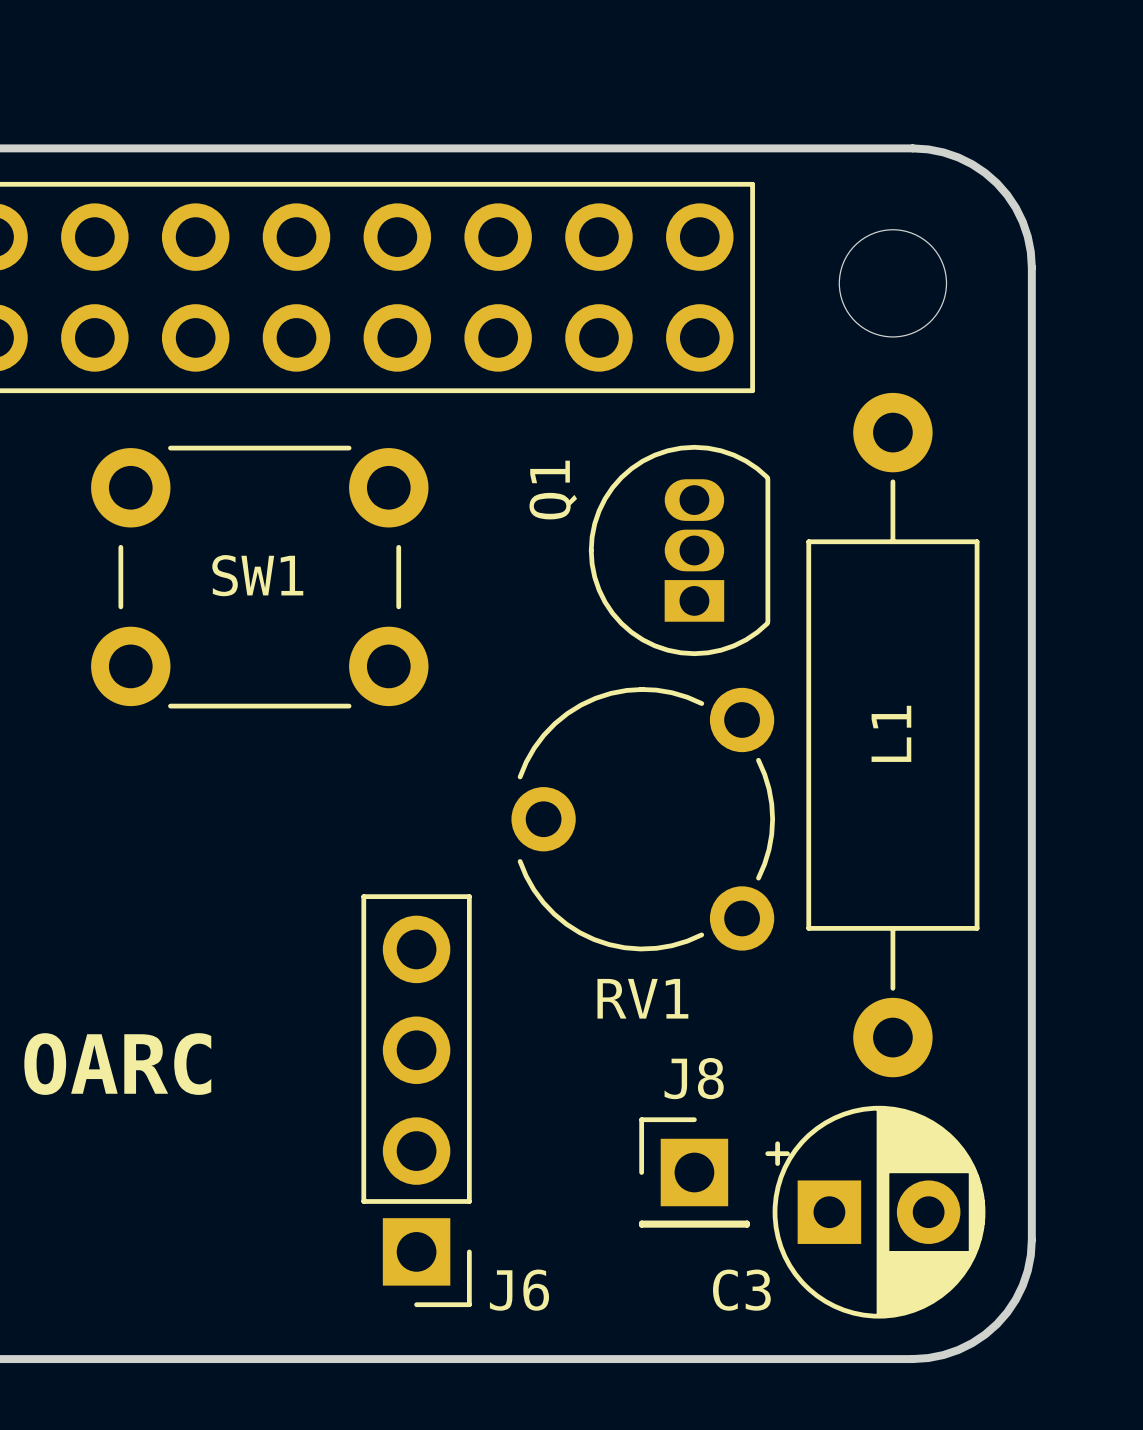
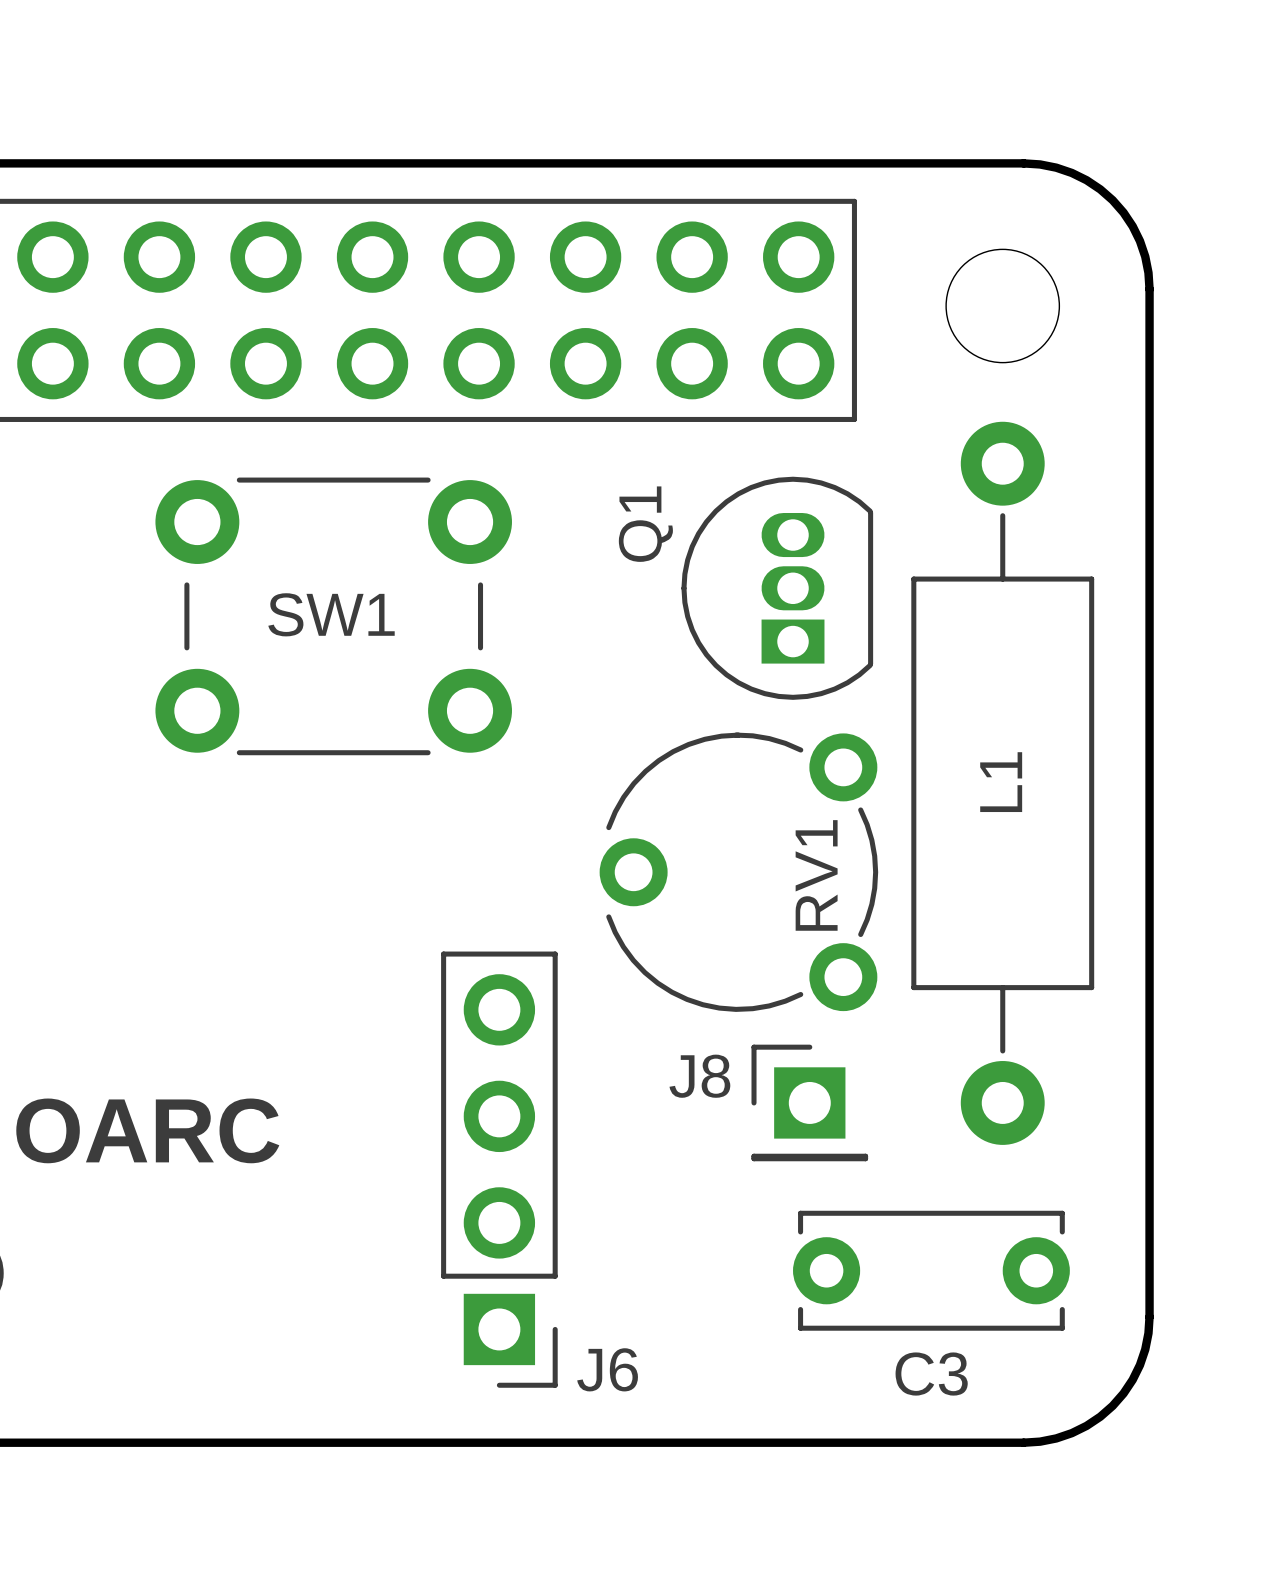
RV1 name rotation: 0° (642, 998) -> 90° counterclockwise (816, 875)
RV1 name position: RV1 (642, 998) -> RV1 (816, 875)
J8 name position: J8 (694, 1078) -> J8 (699, 1076)
C3 footprint: [765, 1105, 986, 1319] -> [793, 1210, 1070, 1331]
J8 position: (694, 1172) -> (809, 1102)
C3 name position: C3 (741, 1290) -> C3 (931, 1374)

